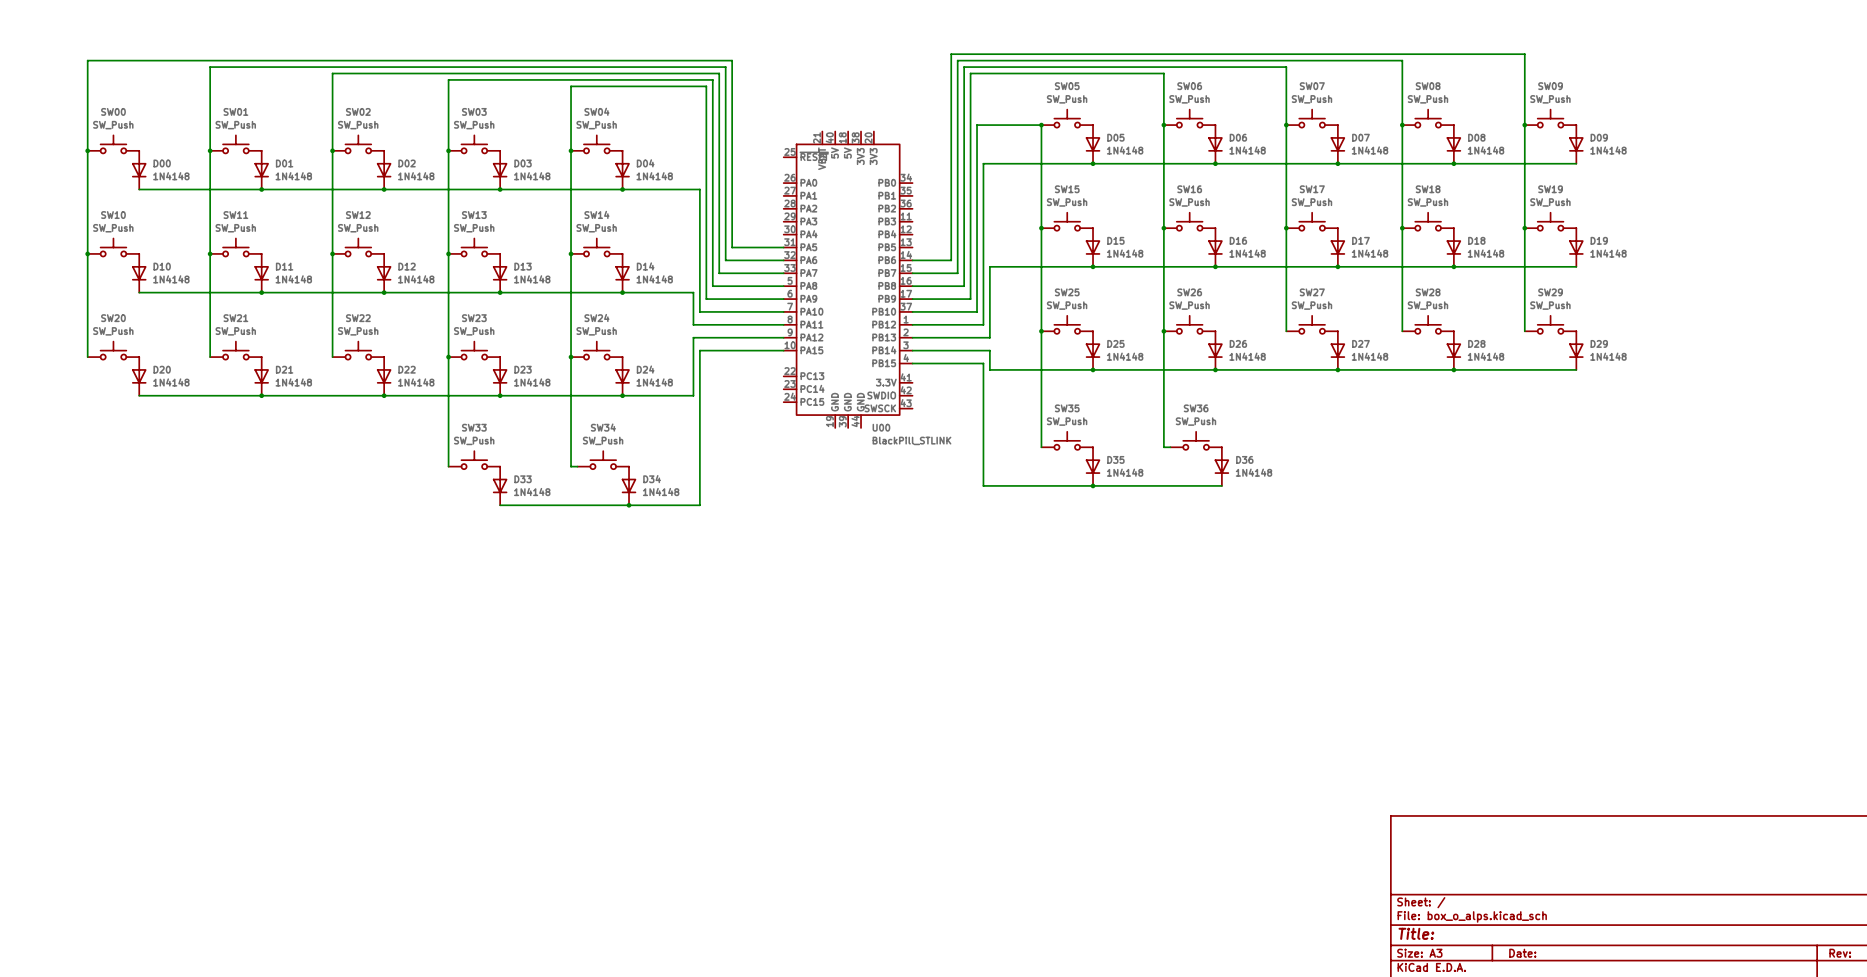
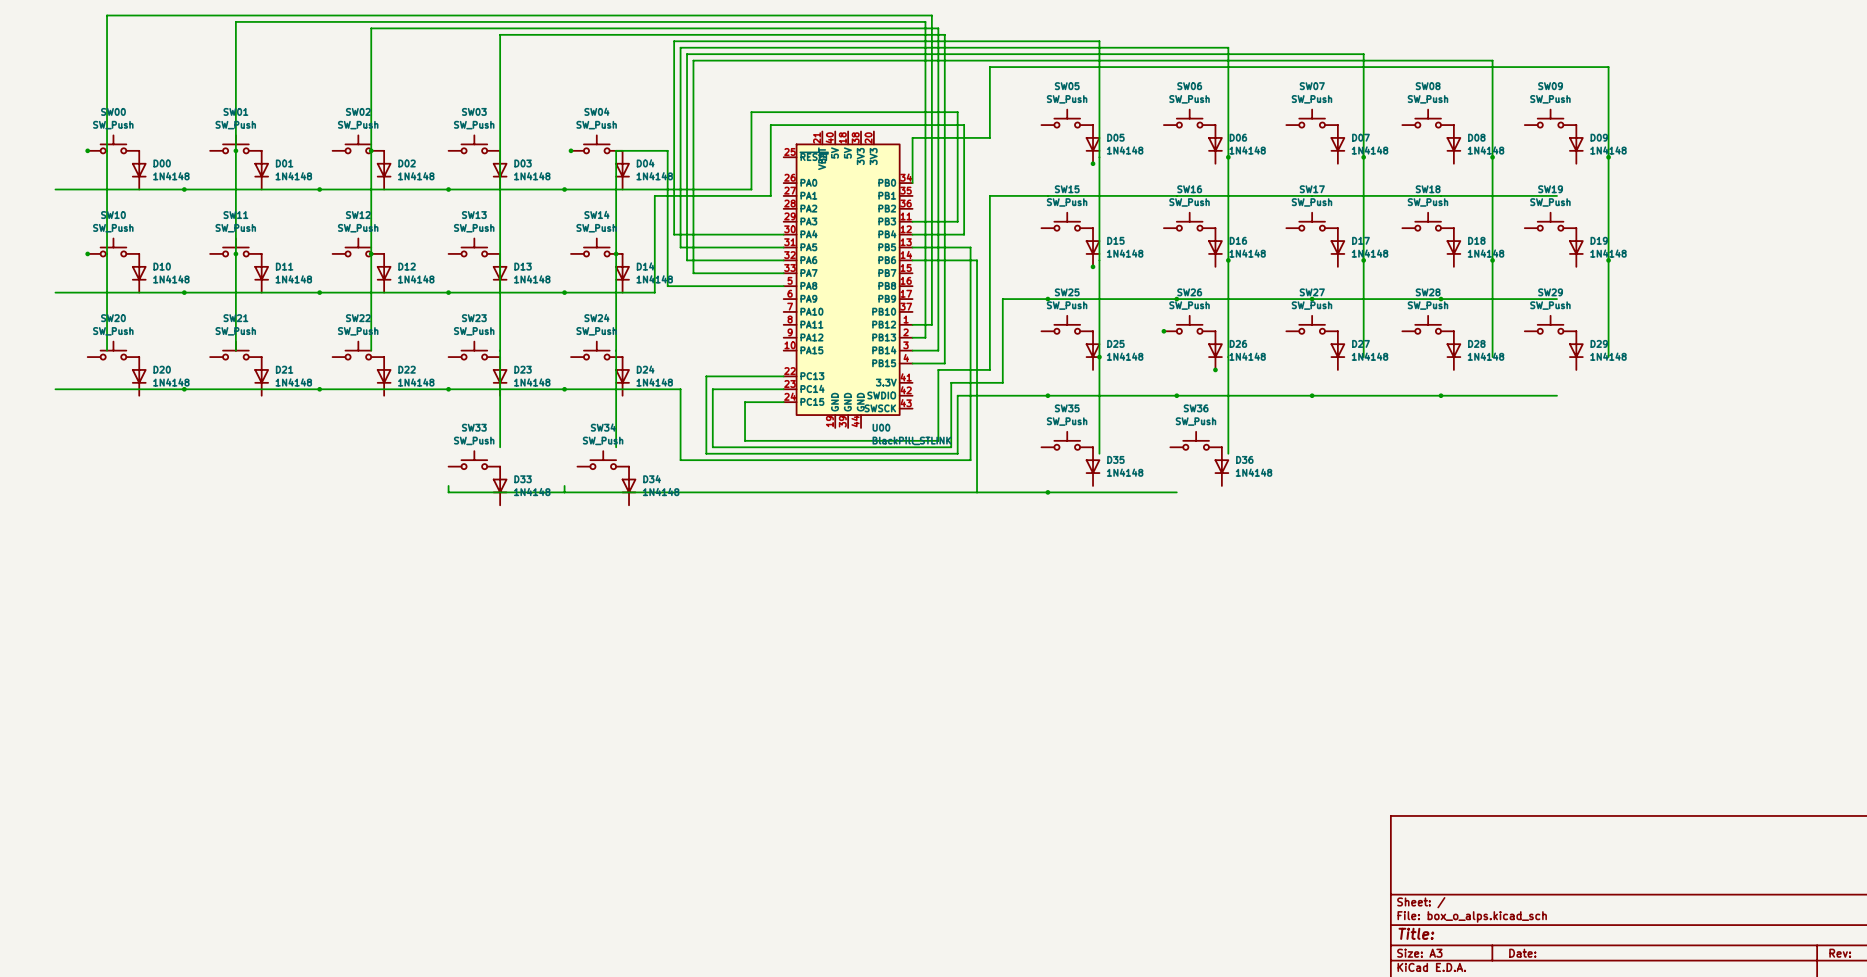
wire: (951, 54) (951, 260) -> (951, 54) (687, 54) (687, 260) (725, 260)
wire: (1363, 54) (1524, 54) (1524, 331) -> (1363, 54) (1363, 357)
wire: (693, 60) (87, 60) (87, 357) -> none
wire: (732, 60) (732, 247) -> (1228, 453) (1228, 47) (680, 47) (680, 247) (732, 247)
wire: (957, 60) (957, 112) -> (957, 60) (732, 60)
wire: (1402, 60) (1402, 331) -> (1402, 60) (1492, 60) (1492, 357)
wire: (989, 67) (964, 67) (964, 125) -> (989, 67) (989, 137) (912, 137) (912, 183)
wire: (1286, 67) (1286, 331) -> (1286, 67) (1608, 67) (1608, 357)
junction: (1041, 125) -> none
junction: (1163, 125) -> none
junction: (1286, 125) -> none
junction: (1402, 125) -> none
junction: (1524, 125) -> none
junction: (210, 150) -> none
junction: none -> (235, 150)
junction: (332, 150) -> none
junction: none -> (371, 150)
junction: (448, 150) -> none
junction: none -> (1363, 157)
junction: none -> (1492, 157)
junction: none -> (1608, 157)
junction position: (1215, 163) -> (1228, 157)
junction: (1337, 163) -> none
junction: (1453, 163) -> none
wire: (1576, 163) (983, 163) (983, 324) (931, 324) -> (107, 350) (107, 15) (931, 15) (931, 324)
wire: none -> (55, 189) (139, 189)
junction: none -> (184, 189)
junction: (261, 189) -> none
junction: none -> (319, 189)
junction: (384, 189) -> none
junction: none -> (448, 189)
junction: (500, 189) -> none
junction: none -> (564, 189)
junction: (622, 189) -> none
wire: (699, 189) (699, 311) (783, 311) -> (699, 189) (751, 189) (751, 112) (957, 112)
wire: (957, 221) (957, 273) (912, 273) -> (957, 221) (912, 221)
junction: (1041, 228) -> none
junction: (1163, 228) -> none
junction: (1286, 228) -> none
junction: (1402, 228) -> none
junction: (1524, 228) -> none
wire: none -> (783, 234) (674, 234) (674, 41) (1099, 41) (1099, 453)
wire: (964, 234) (964, 286) (912, 286) -> (964, 234) (912, 234)
wire: (970, 247) (970, 73) (1163, 73) (1163, 447) (1170, 447) -> (970, 247) (912, 247)
junction: (210, 253) -> none
junction: none -> (235, 253)
junction: (332, 253) -> none
junction: none -> (371, 253)
junction: (448, 253) -> none
junction: (571, 253) -> none
junction: none -> (616, 253)
wire: (725, 260) (725, 67) (210, 67) (210, 357) -> none
wire: (977, 260) (977, 125) (1041, 125) (1041, 447) -> (977, 260) (951, 260)
junction: none -> (1363, 260)
junction: none -> (1492, 260)
junction: none -> (1608, 260)
wire: (989, 266) (1576, 266) -> (989, 266) (989, 195) (1557, 195)
junction position: (1215, 266) -> (1228, 260)
junction: (1337, 266) -> none
junction: (1453, 266) -> none
wire: (719, 273) (719, 73) (332, 73) (332, 357) -> (719, 273) (693, 273) (693, 60)
wire: (712, 286) (712, 79) (448, 79) (448, 466) -> (712, 286) (667, 286) (667, 150) (616, 150) (616, 447)
wire: none -> (55, 292) (139, 292)
junction: none -> (184, 292)
junction: (261, 292) -> none
junction: none -> (319, 292)
junction: (384, 292) -> none
junction: none -> (448, 292)
junction: (500, 292) -> none
junction: none -> (564, 292)
junction: (622, 292) -> none
wire: (654, 292) (693, 292) (693, 324) (783, 324) -> (654, 292) (654, 195) (770, 195) (770, 125) (964, 125)
wire: (783, 299) (706, 299) (706, 86) (571, 86) (571, 466) (577, 466) -> none
wire: (912, 299) (970, 299) -> (55, 389) (680, 389) (680, 460) (970, 460) (970, 299)
junction: none -> (1047, 299)
junction: none -> (1176, 299)
junction: none -> (1312, 299)
junction: none -> (1441, 299)
wire: none -> (1557, 299) (1002, 299) (1002, 382) (951, 382) (951, 447) (712, 447) (712, 389) (783, 389)
wire: (912, 311) (977, 311) -> (977, 492) (977, 311)
junction: (1041, 331) -> none
wire: (783, 337) (693, 337) (693, 395) (139, 395) -> none
wire: (925, 337) (989, 337) -> (925, 337) (925, 21) (235, 21) (235, 350)
wire: none -> (371, 350) (371, 28) (938, 28) (938, 350)
wire: (783, 350) (699, 350) (699, 505) (500, 505) -> none
wire: (938, 350) (989, 350) -> (989, 337) (989, 350)
junction: (448, 357) -> none
junction: (571, 357) -> none
wire: (944, 363) (983, 363) (983, 485) (1221, 485) -> (944, 363) (944, 34) (500, 34) (500, 447)
wire: (989, 369) (1576, 369) -> (989, 369) (938, 369) (938, 440) (745, 440) (745, 402) (783, 402)
junction position: (1093, 369) -> (1099, 357)
junction: (1337, 369) -> none
junction position: (1453, 369) -> (1441, 395)
wire: none -> (783, 376) (706, 376) (706, 453) (957, 453) (957, 395) (1557, 395)
junction: none -> (184, 389)
junction: none -> (319, 389)
junction: none -> (448, 389)
junction: none -> (564, 389)
junction: (261, 395) -> none
junction: (384, 395) -> none
junction: (500, 395) -> none
junction: (622, 395) -> none
junction: none -> (1047, 395)
junction: none -> (1176, 395)
junction: none -> (1312, 395)
wire: none -> (448, 485) (448, 492) (1176, 492)
wire: none -> (564, 485) (564, 492)
junction: (1093, 485) -> none
junction: none -> (1047, 492)
junction: (629, 505) -> none

